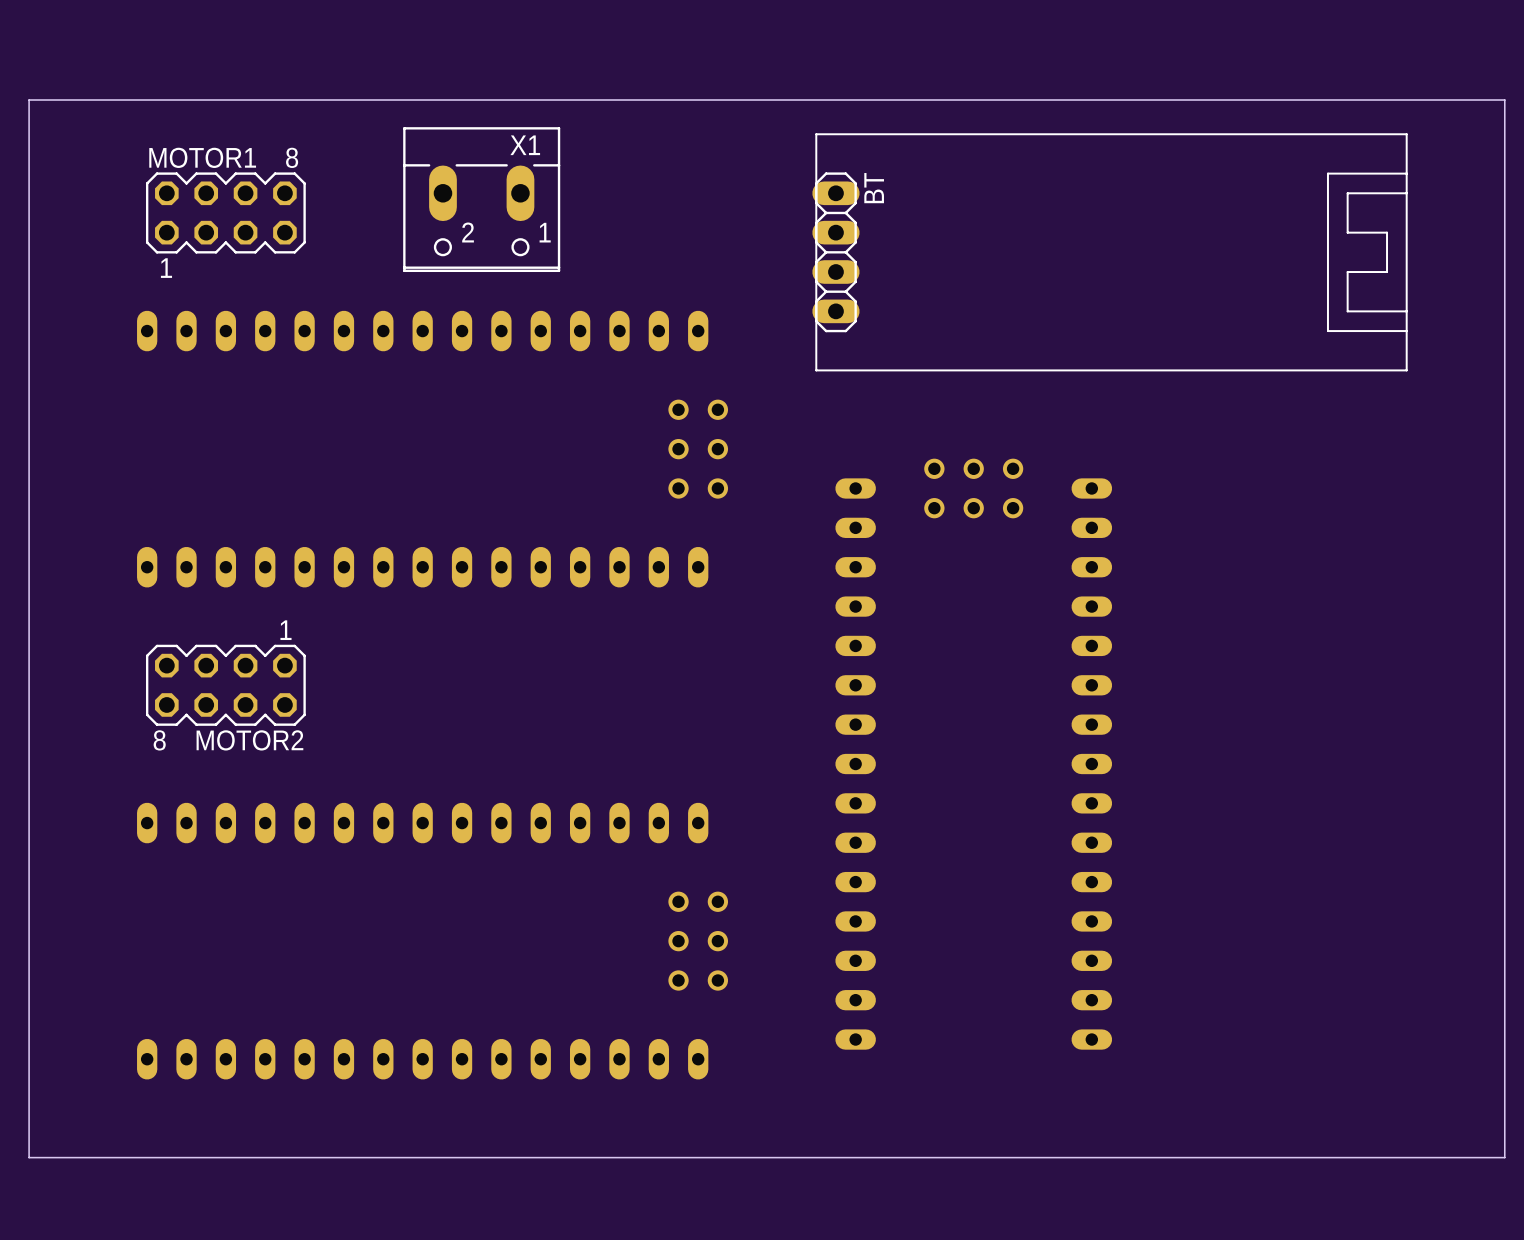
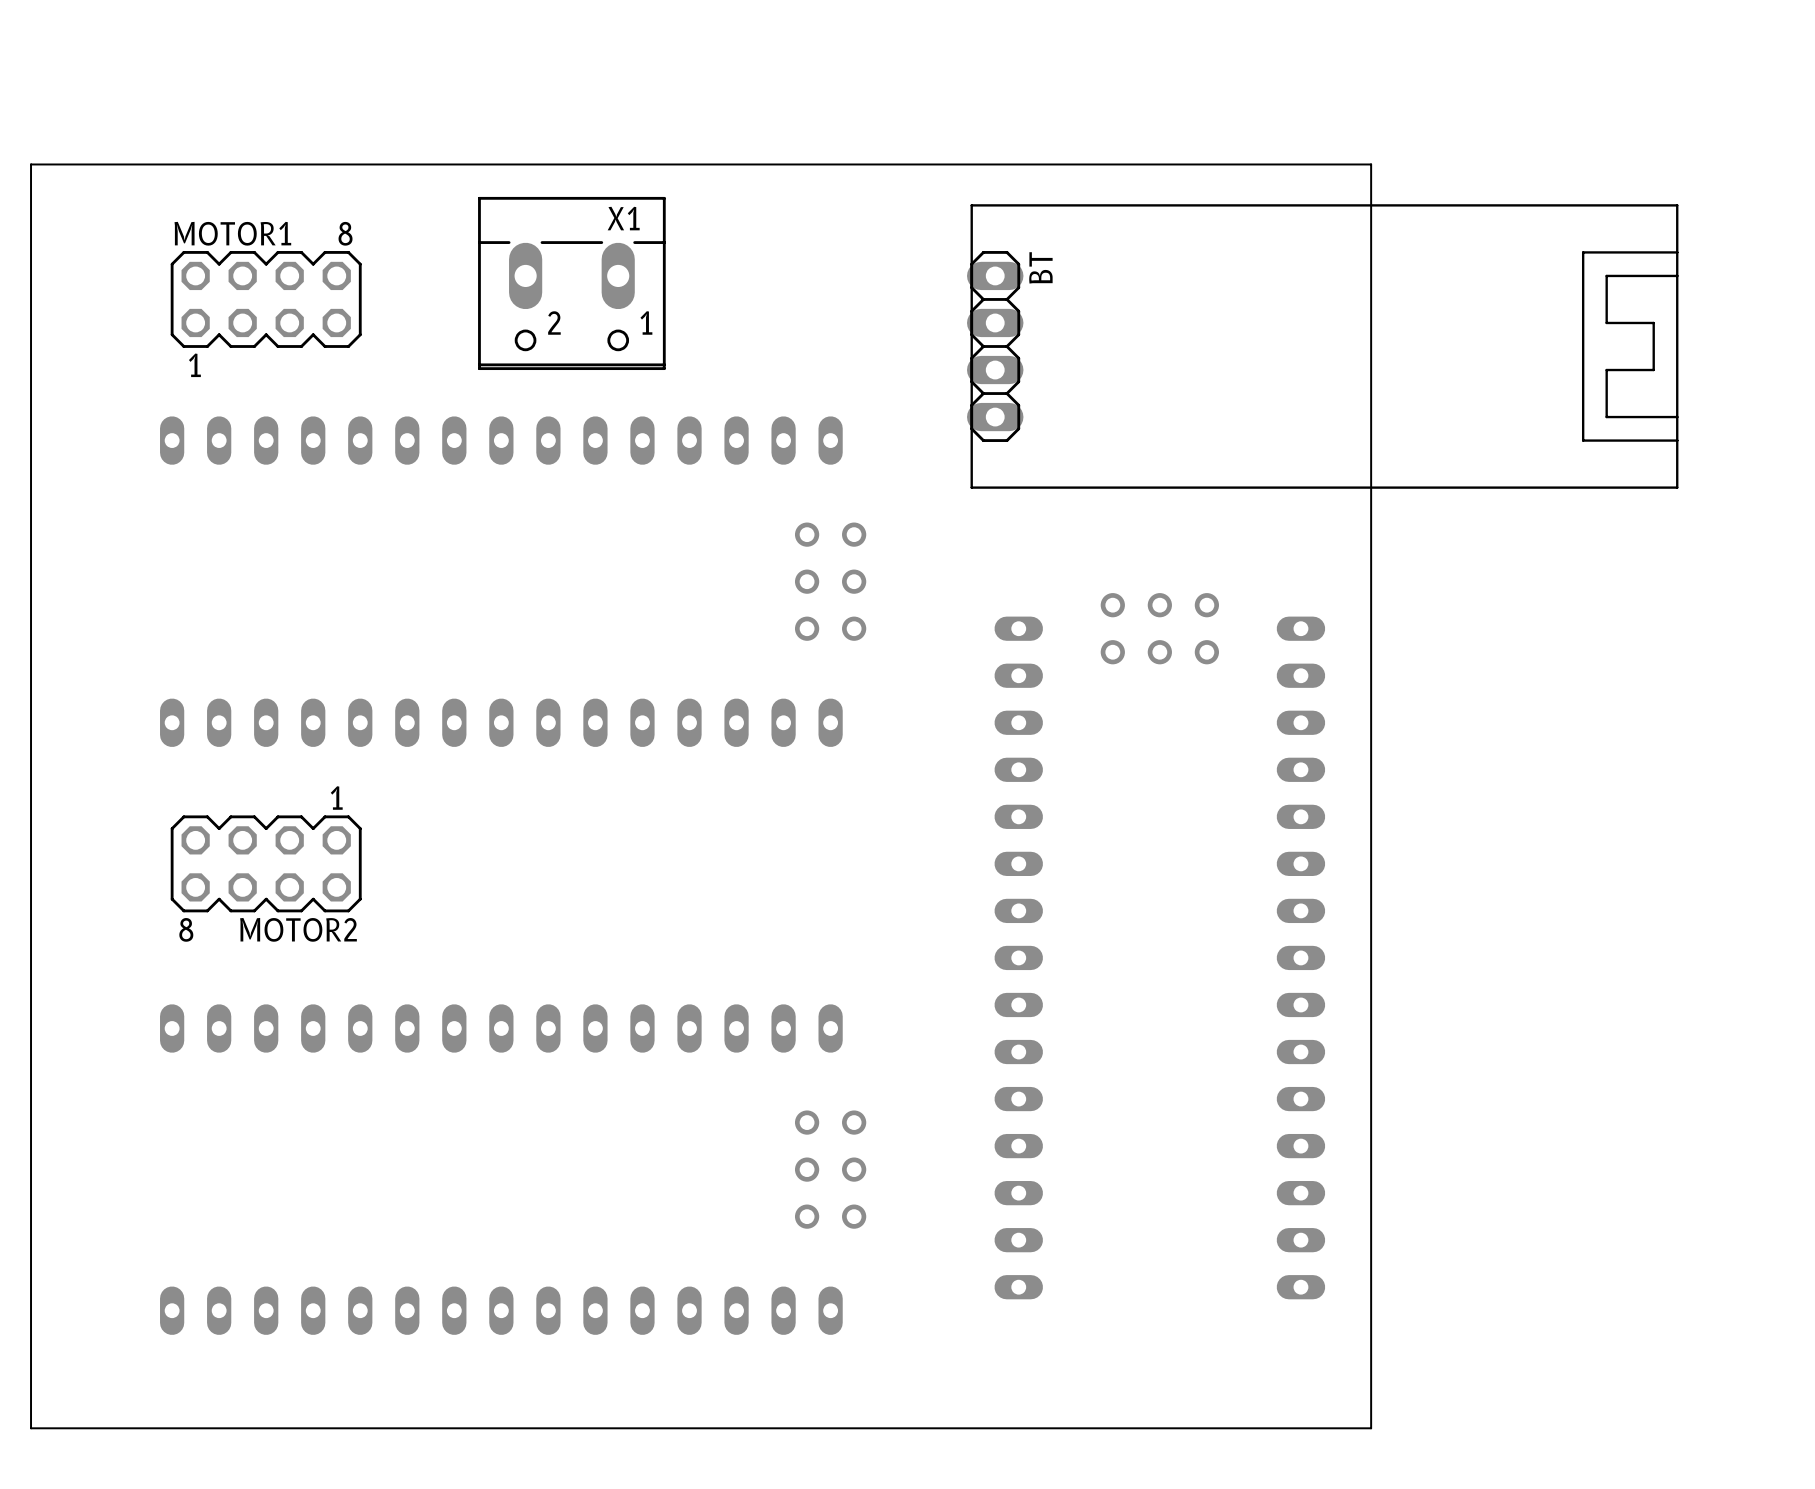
board edge: (1150, 100) (1504, 100) (1504, 1157) (1150, 1157) -> (1371, 164) (1371, 1428)

